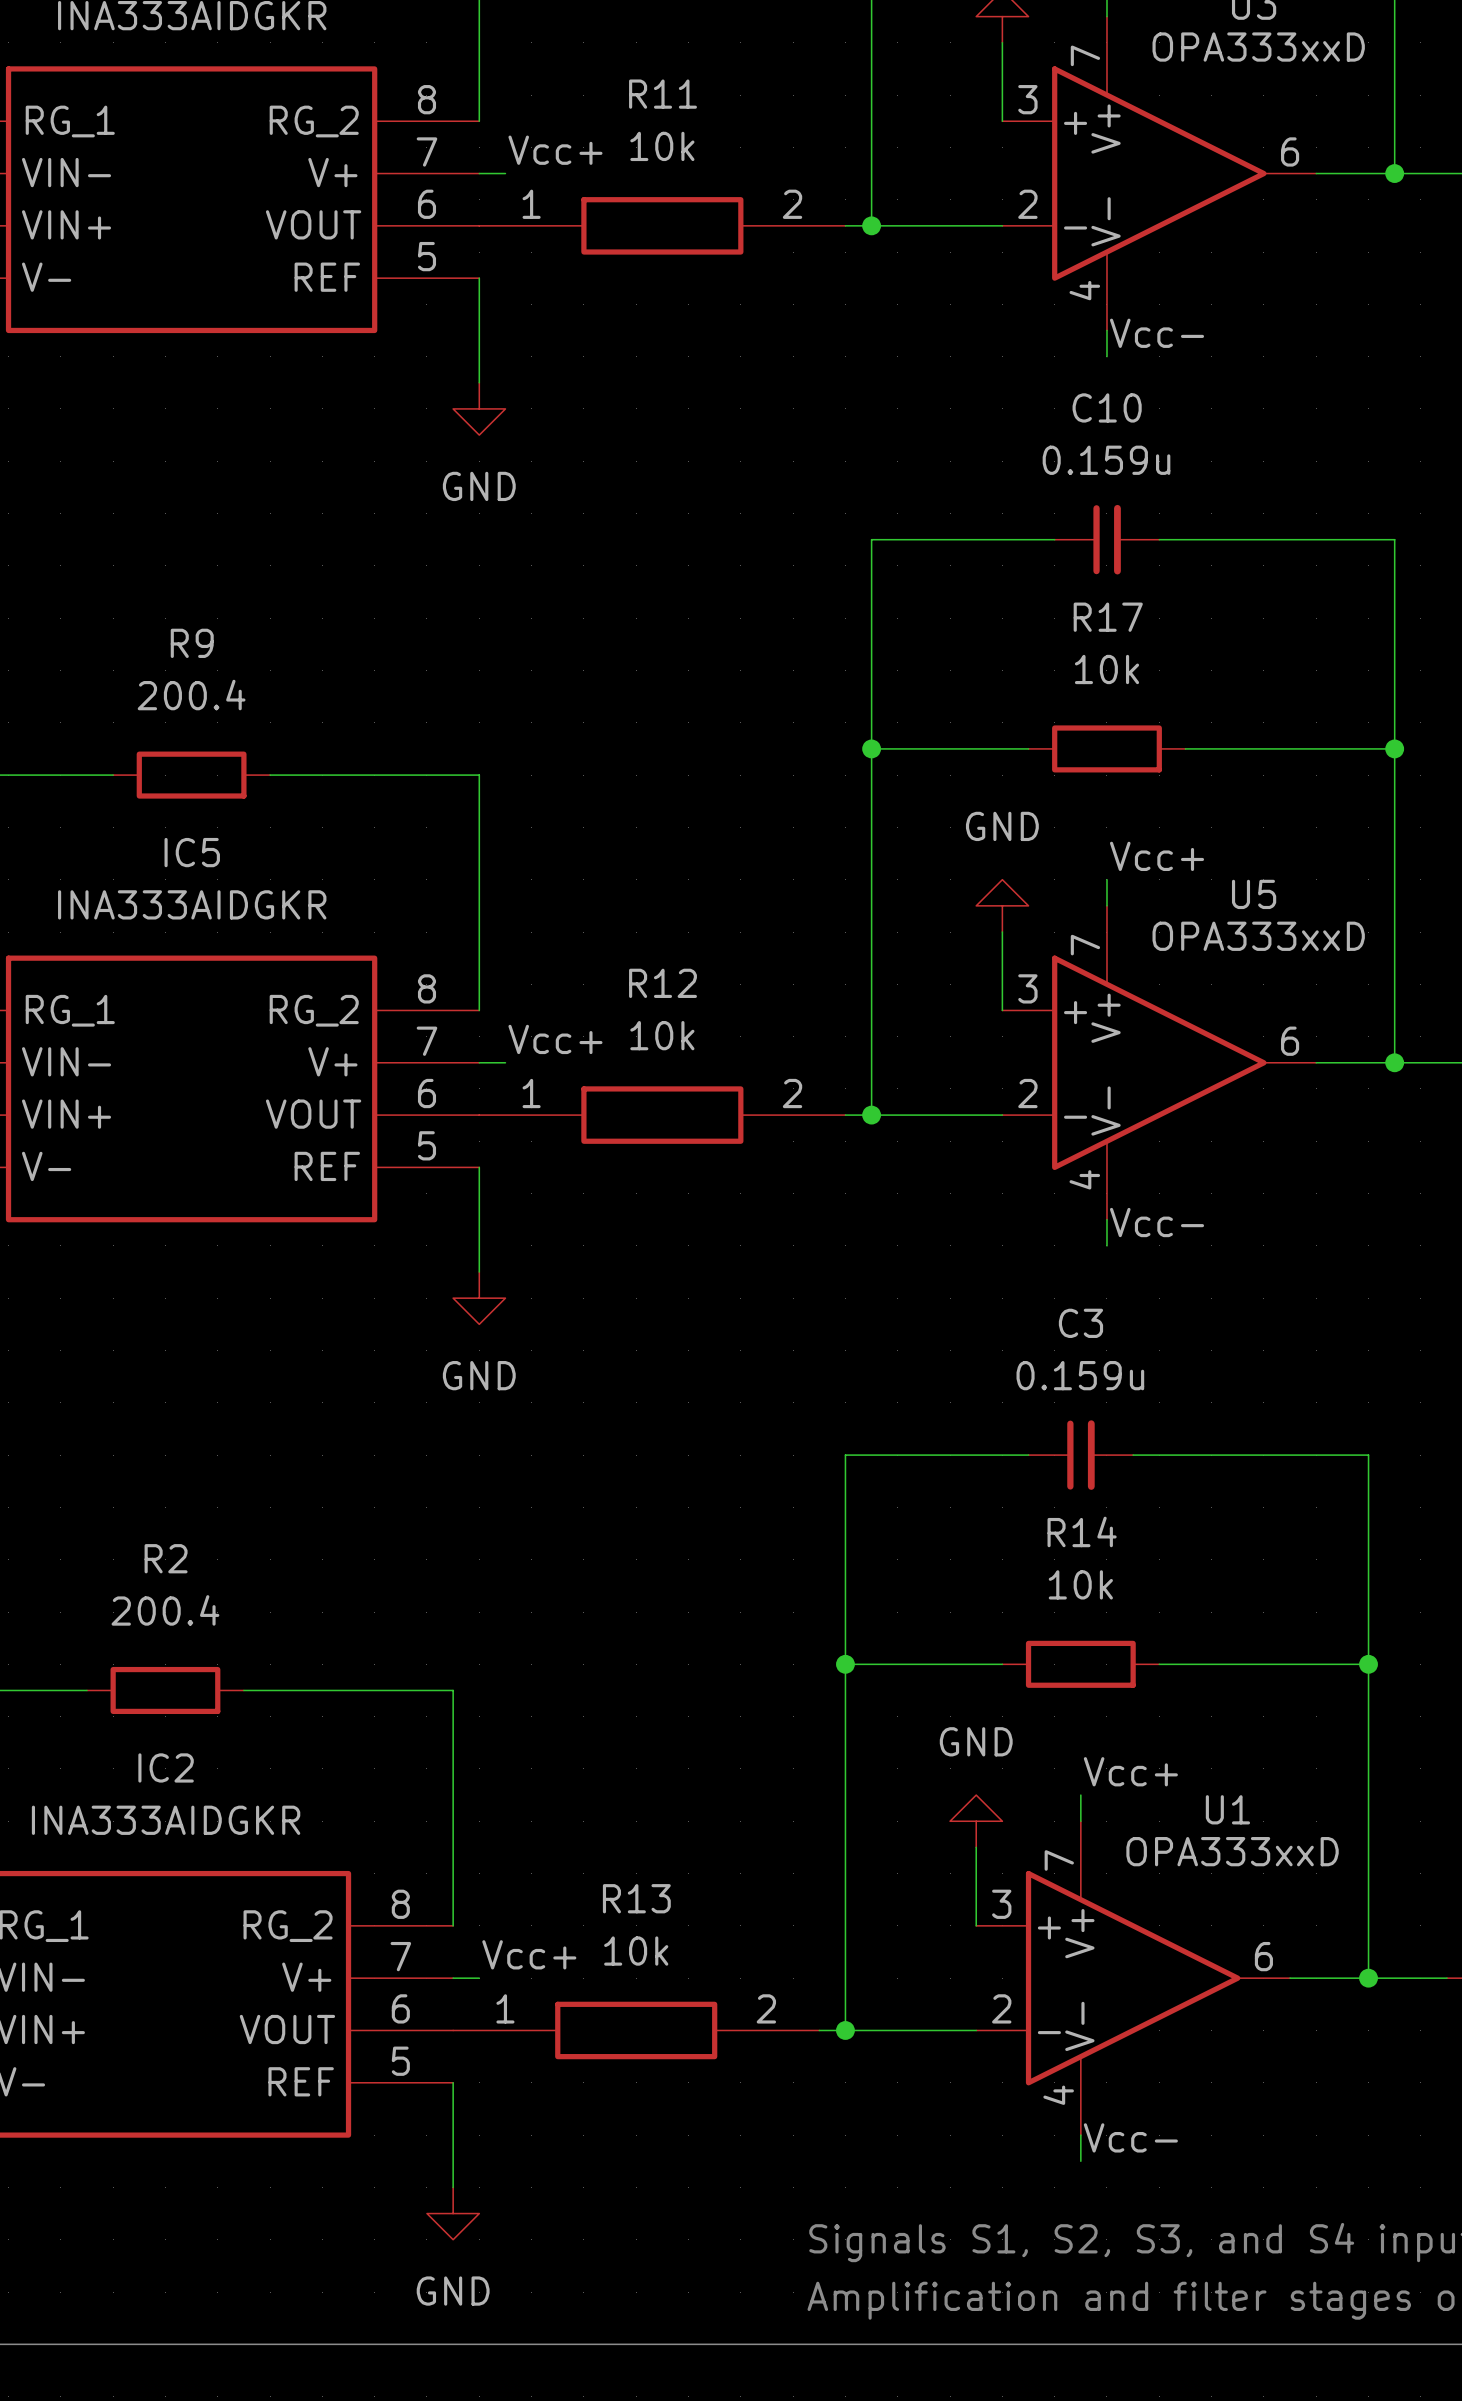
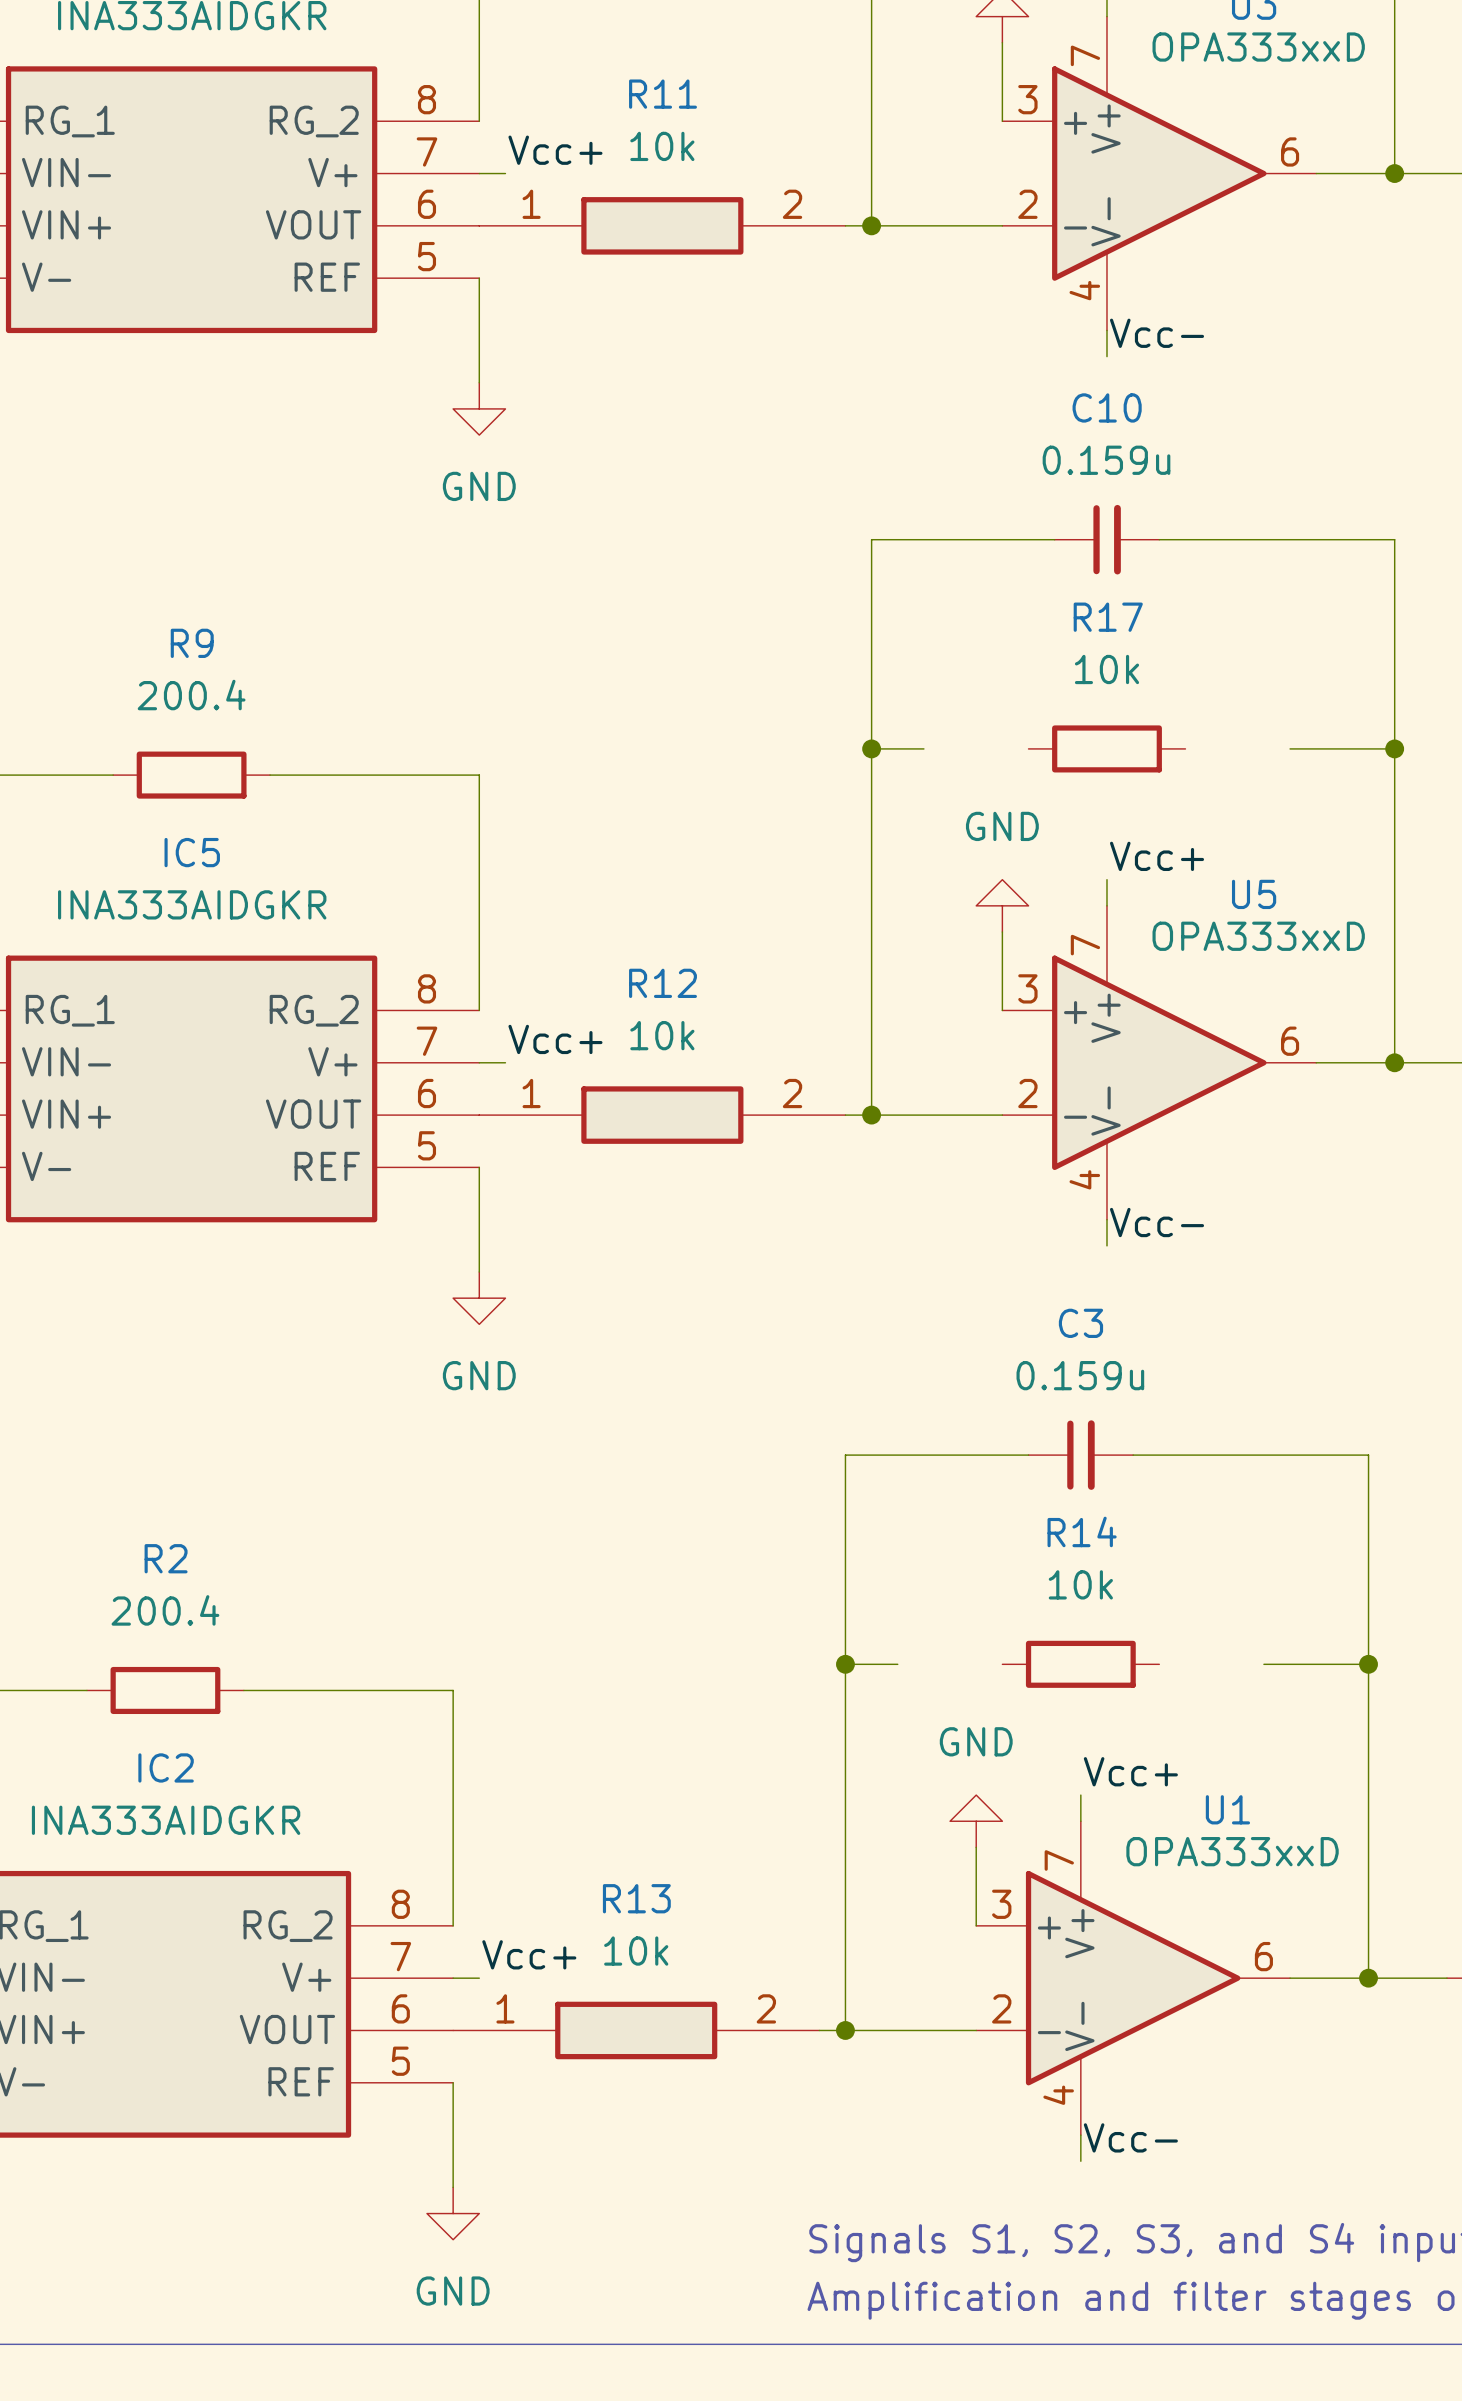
wire: (923, 748) (1028, 748) -> none
wire: (1185, 748) (1290, 748) -> none
wire: (897, 1664) (1002, 1664) -> none
wire: (1159, 1664) (1263, 1664) -> none

